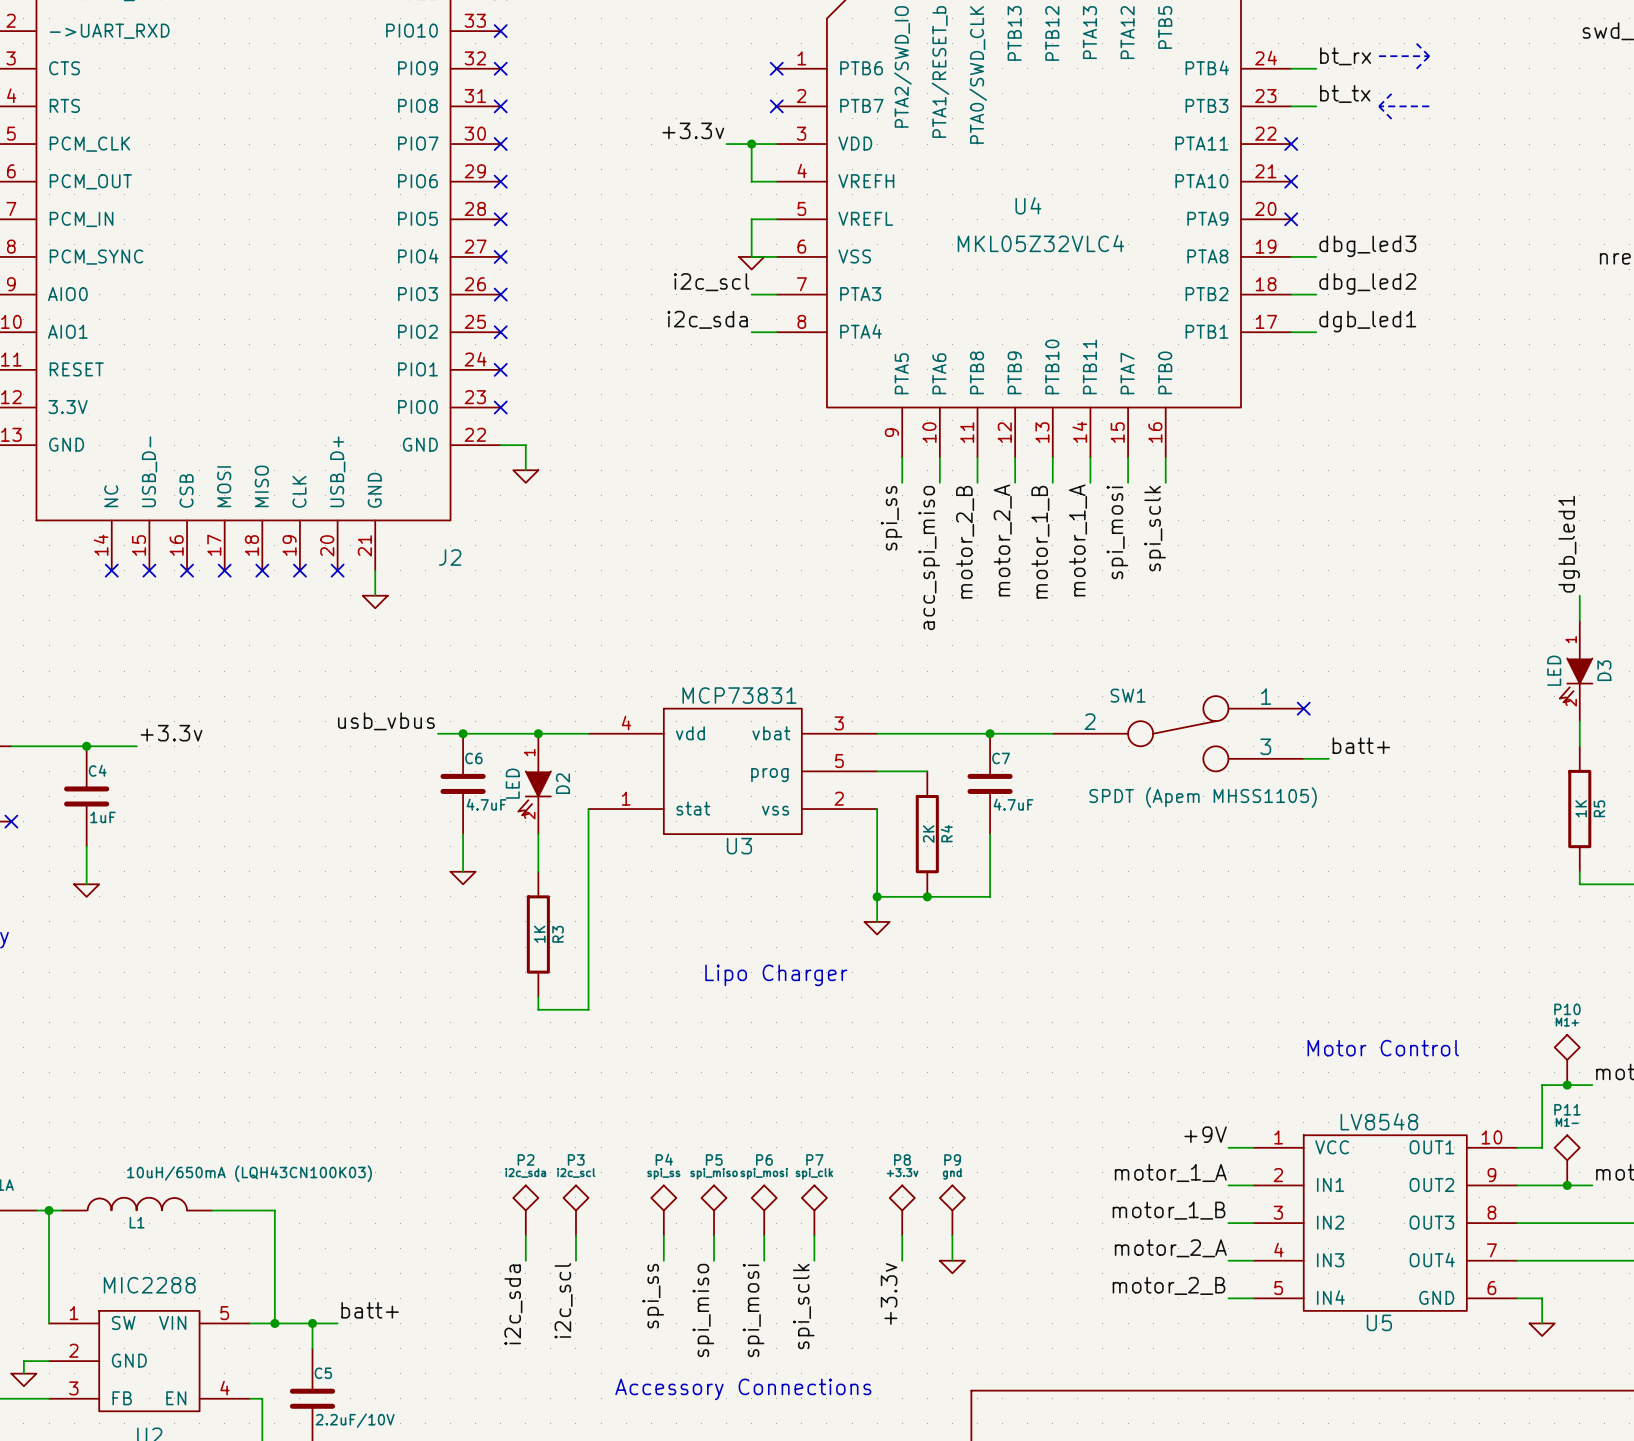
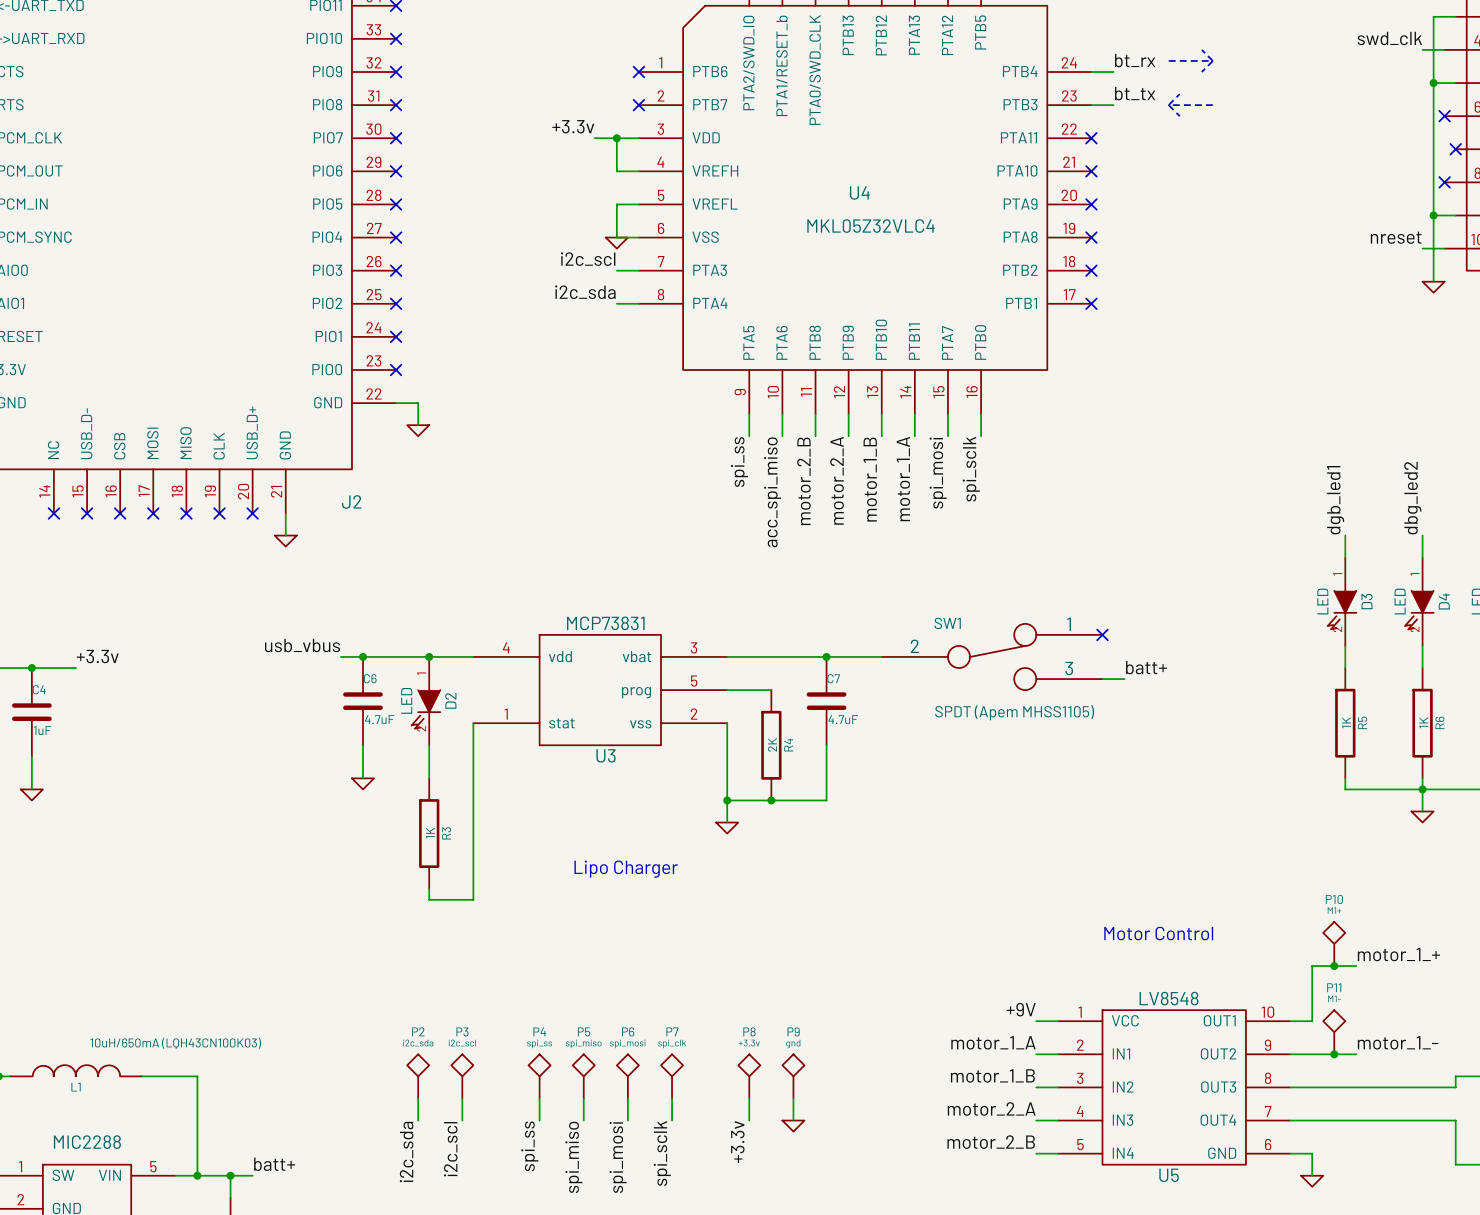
label: dbg_led3 (1367, 246) -> none
wire: (1291, 256) (1316, 256) -> none
no-connect mark: none -> (1091, 237)
label: dbg_led2 (1367, 283) -> none
wire: (1291, 294) (1316, 294) -> none
no-connect mark: none -> (1091, 270)
label: dgb_led1 (1367, 321) -> none
wire: (1291, 332) (1316, 332) -> none
no-connect mark: none -> (1091, 303)

